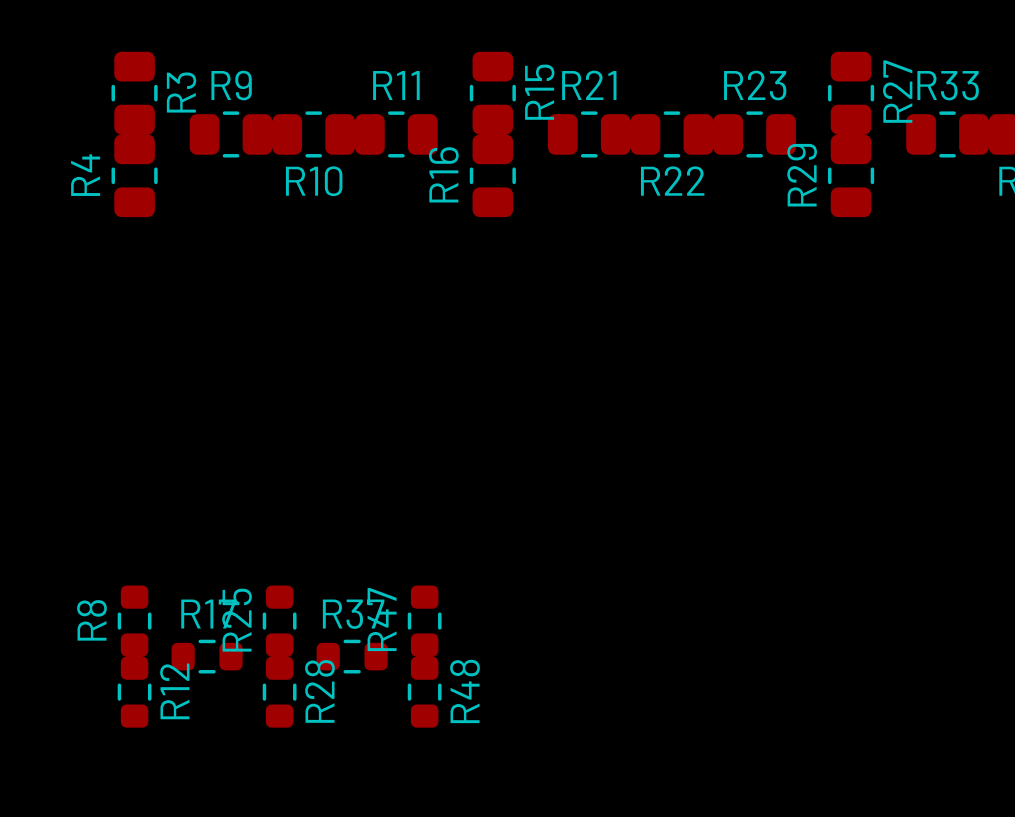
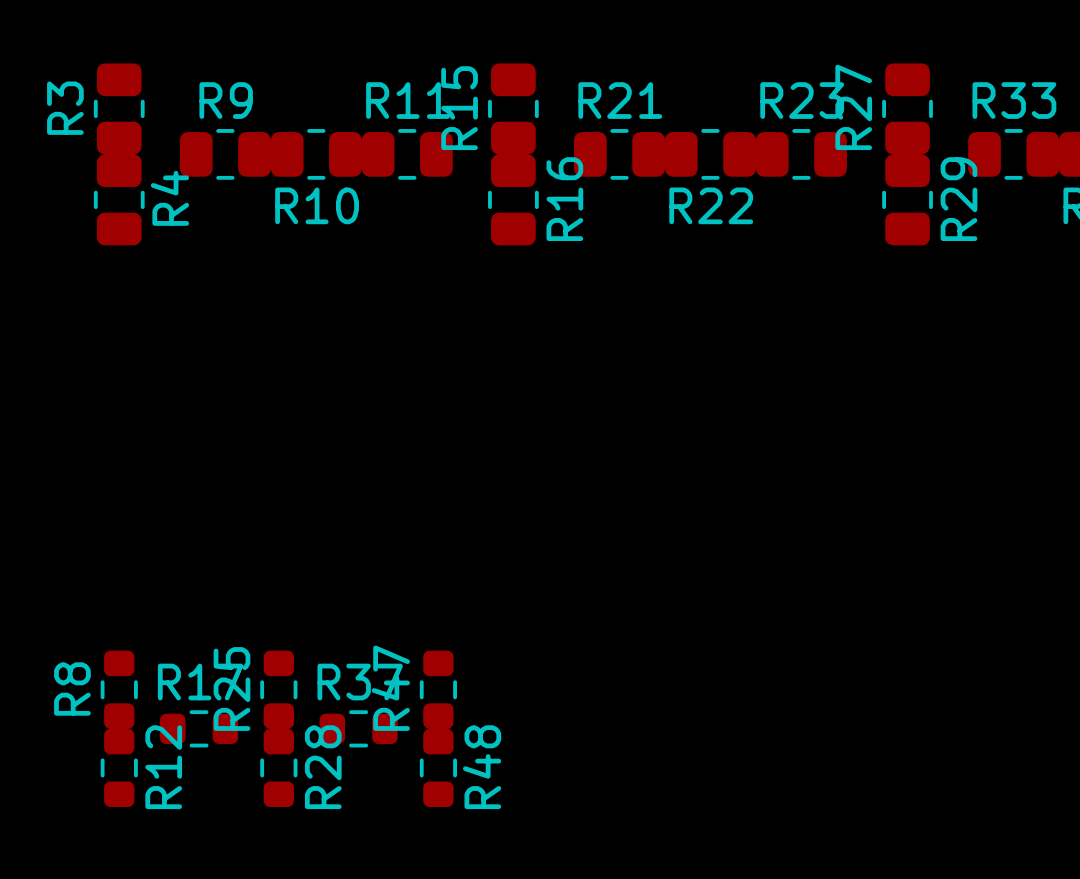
R27 name position: R27 (897, 91) -> R27 (853, 107)
R3 name position: R3 (181, 92) -> R3 (65, 108)
R15 name position: R15 (539, 92) -> R15 (459, 108)
R16 name position: R16 (443, 174) -> R16 (564, 199)
R4 name position: R4 (85, 175) -> R4 (169, 198)
R29 name position: R29 (802, 175) -> R29 (959, 199)

